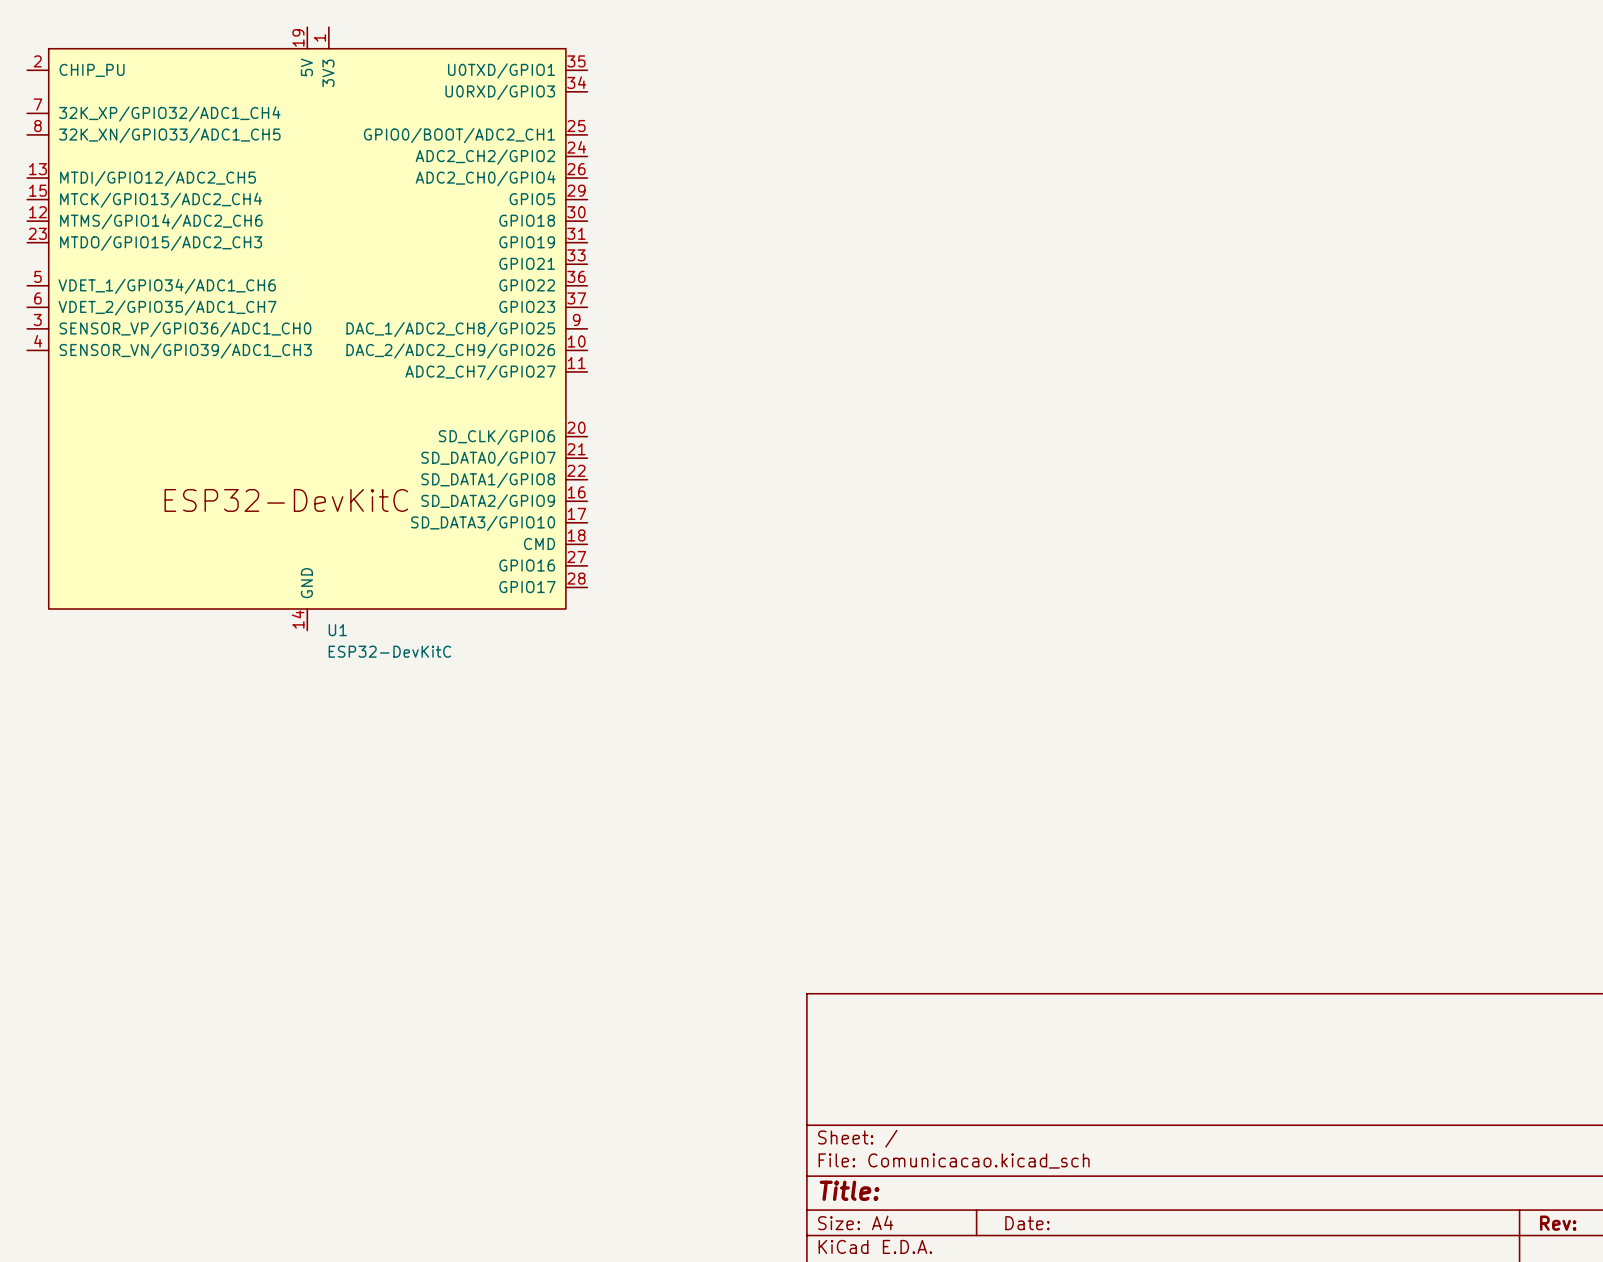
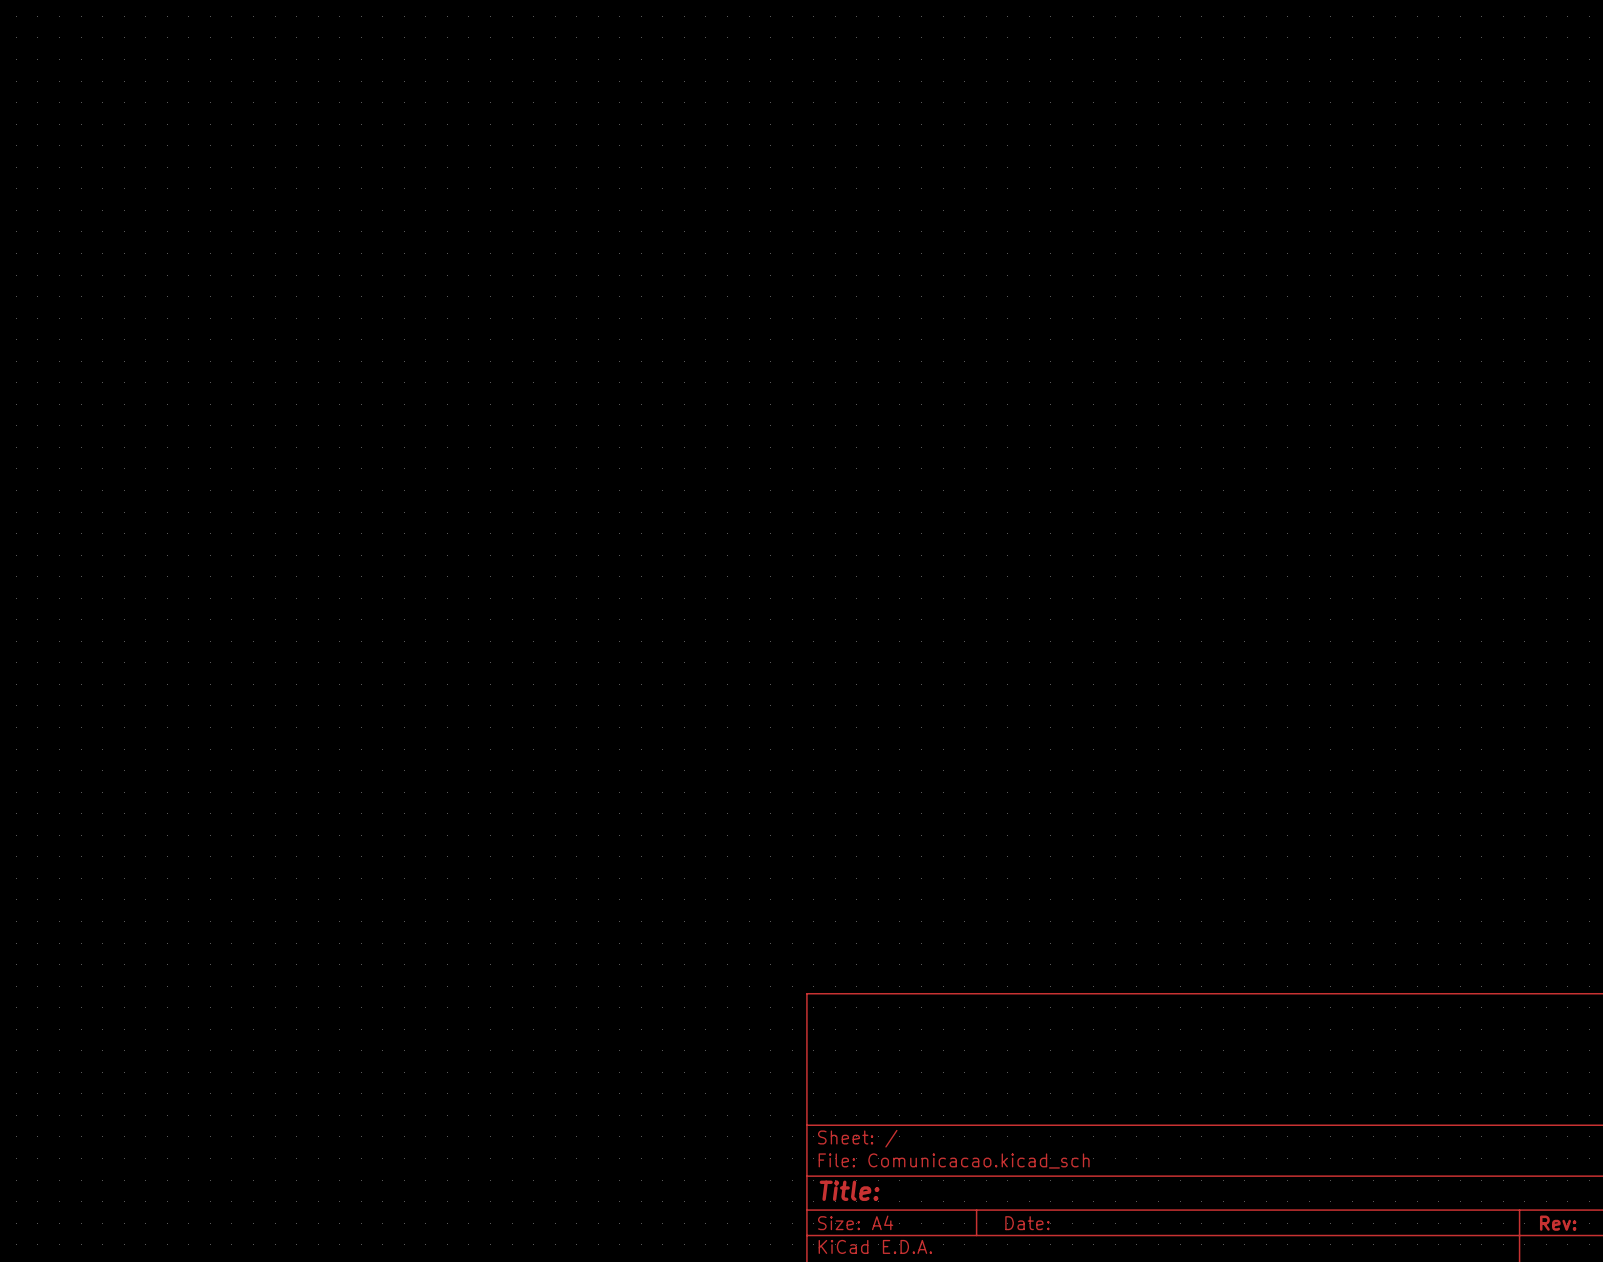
U1: ESP32-DevKitC (307, 328) -> none

